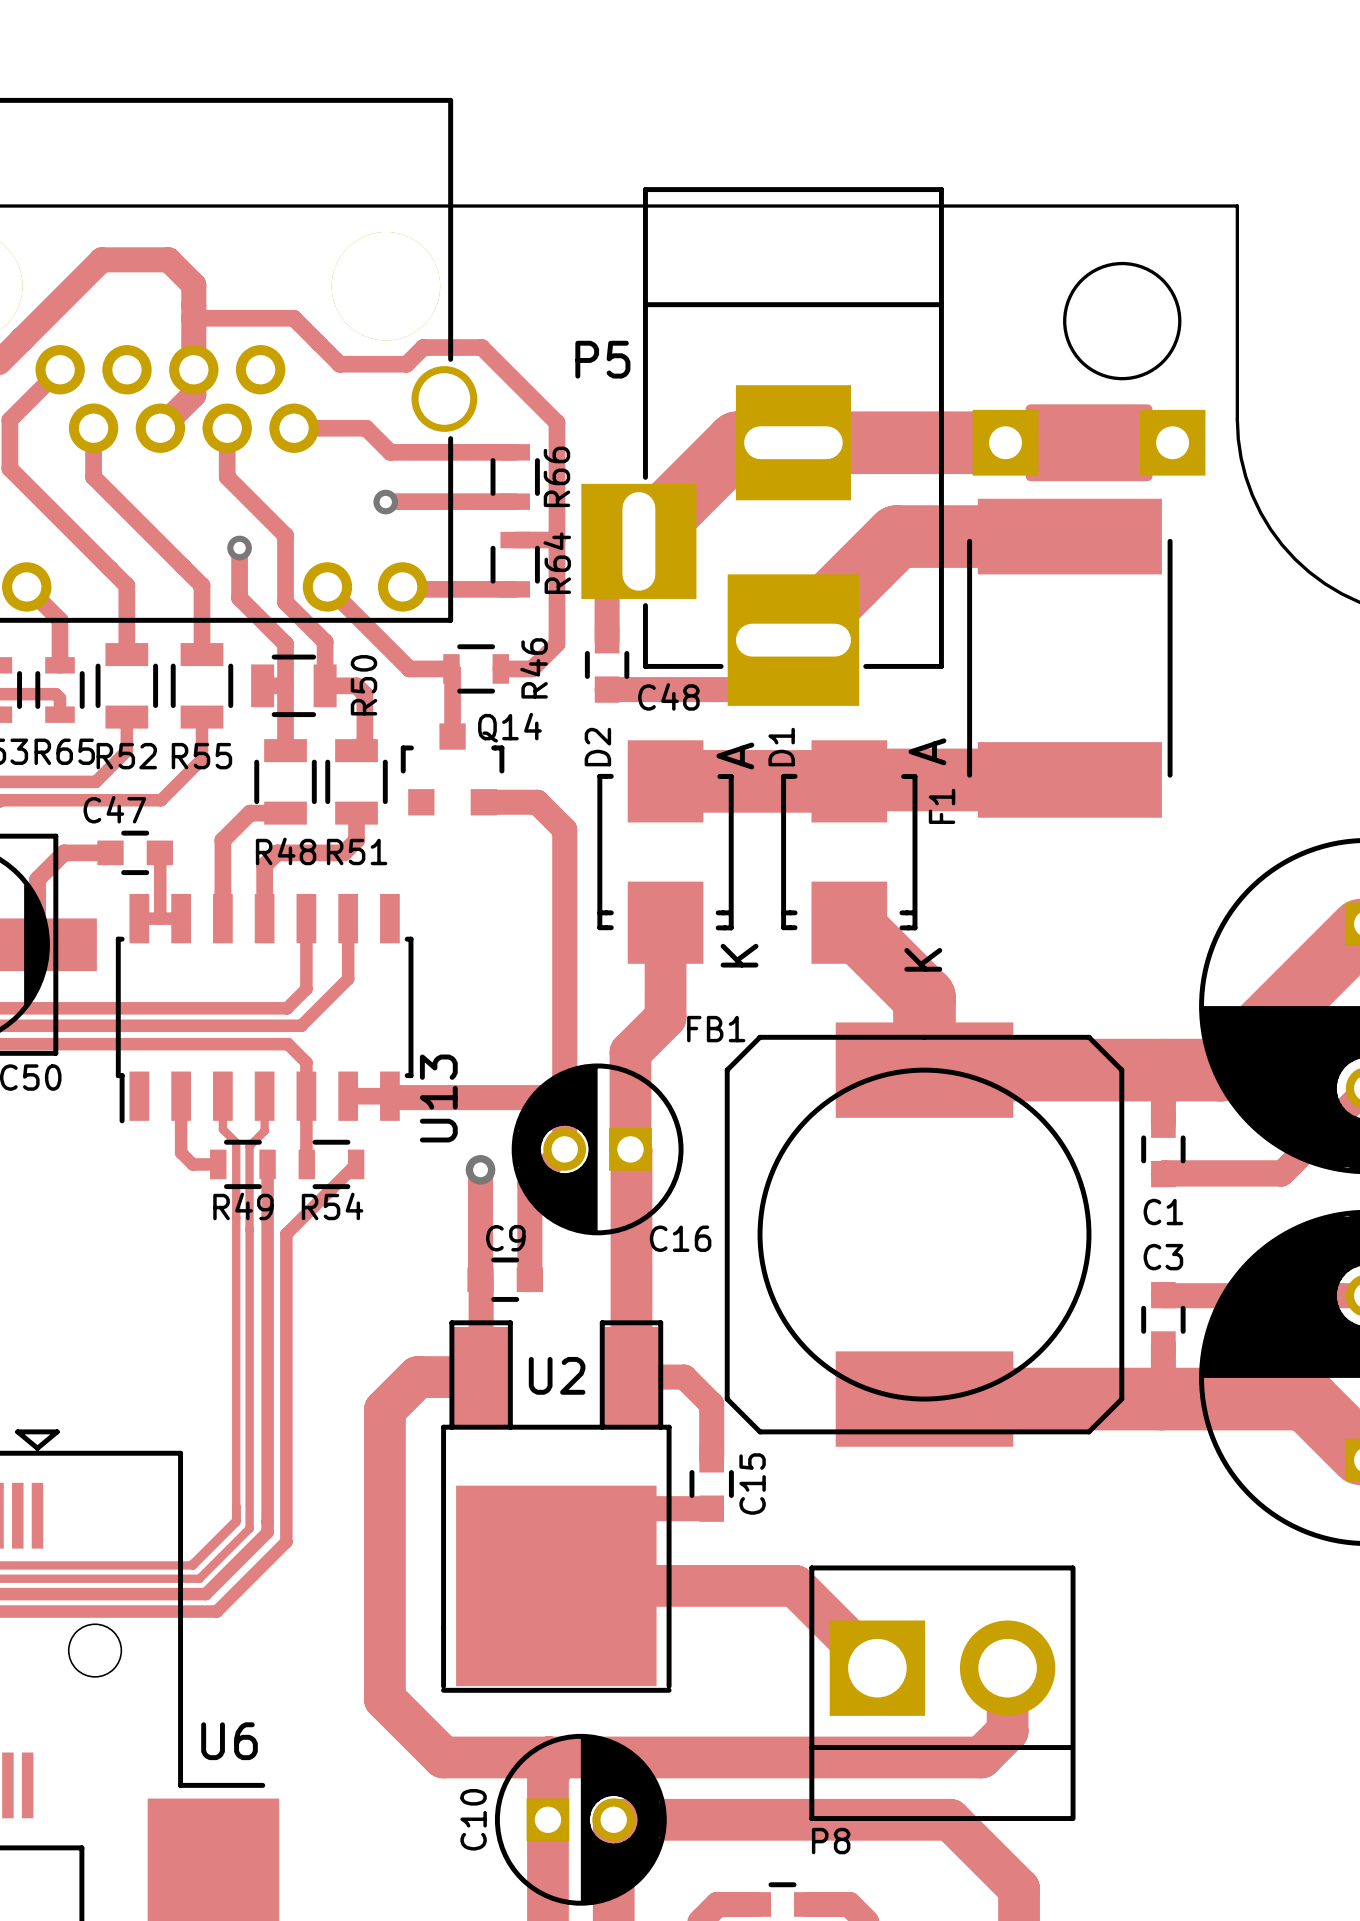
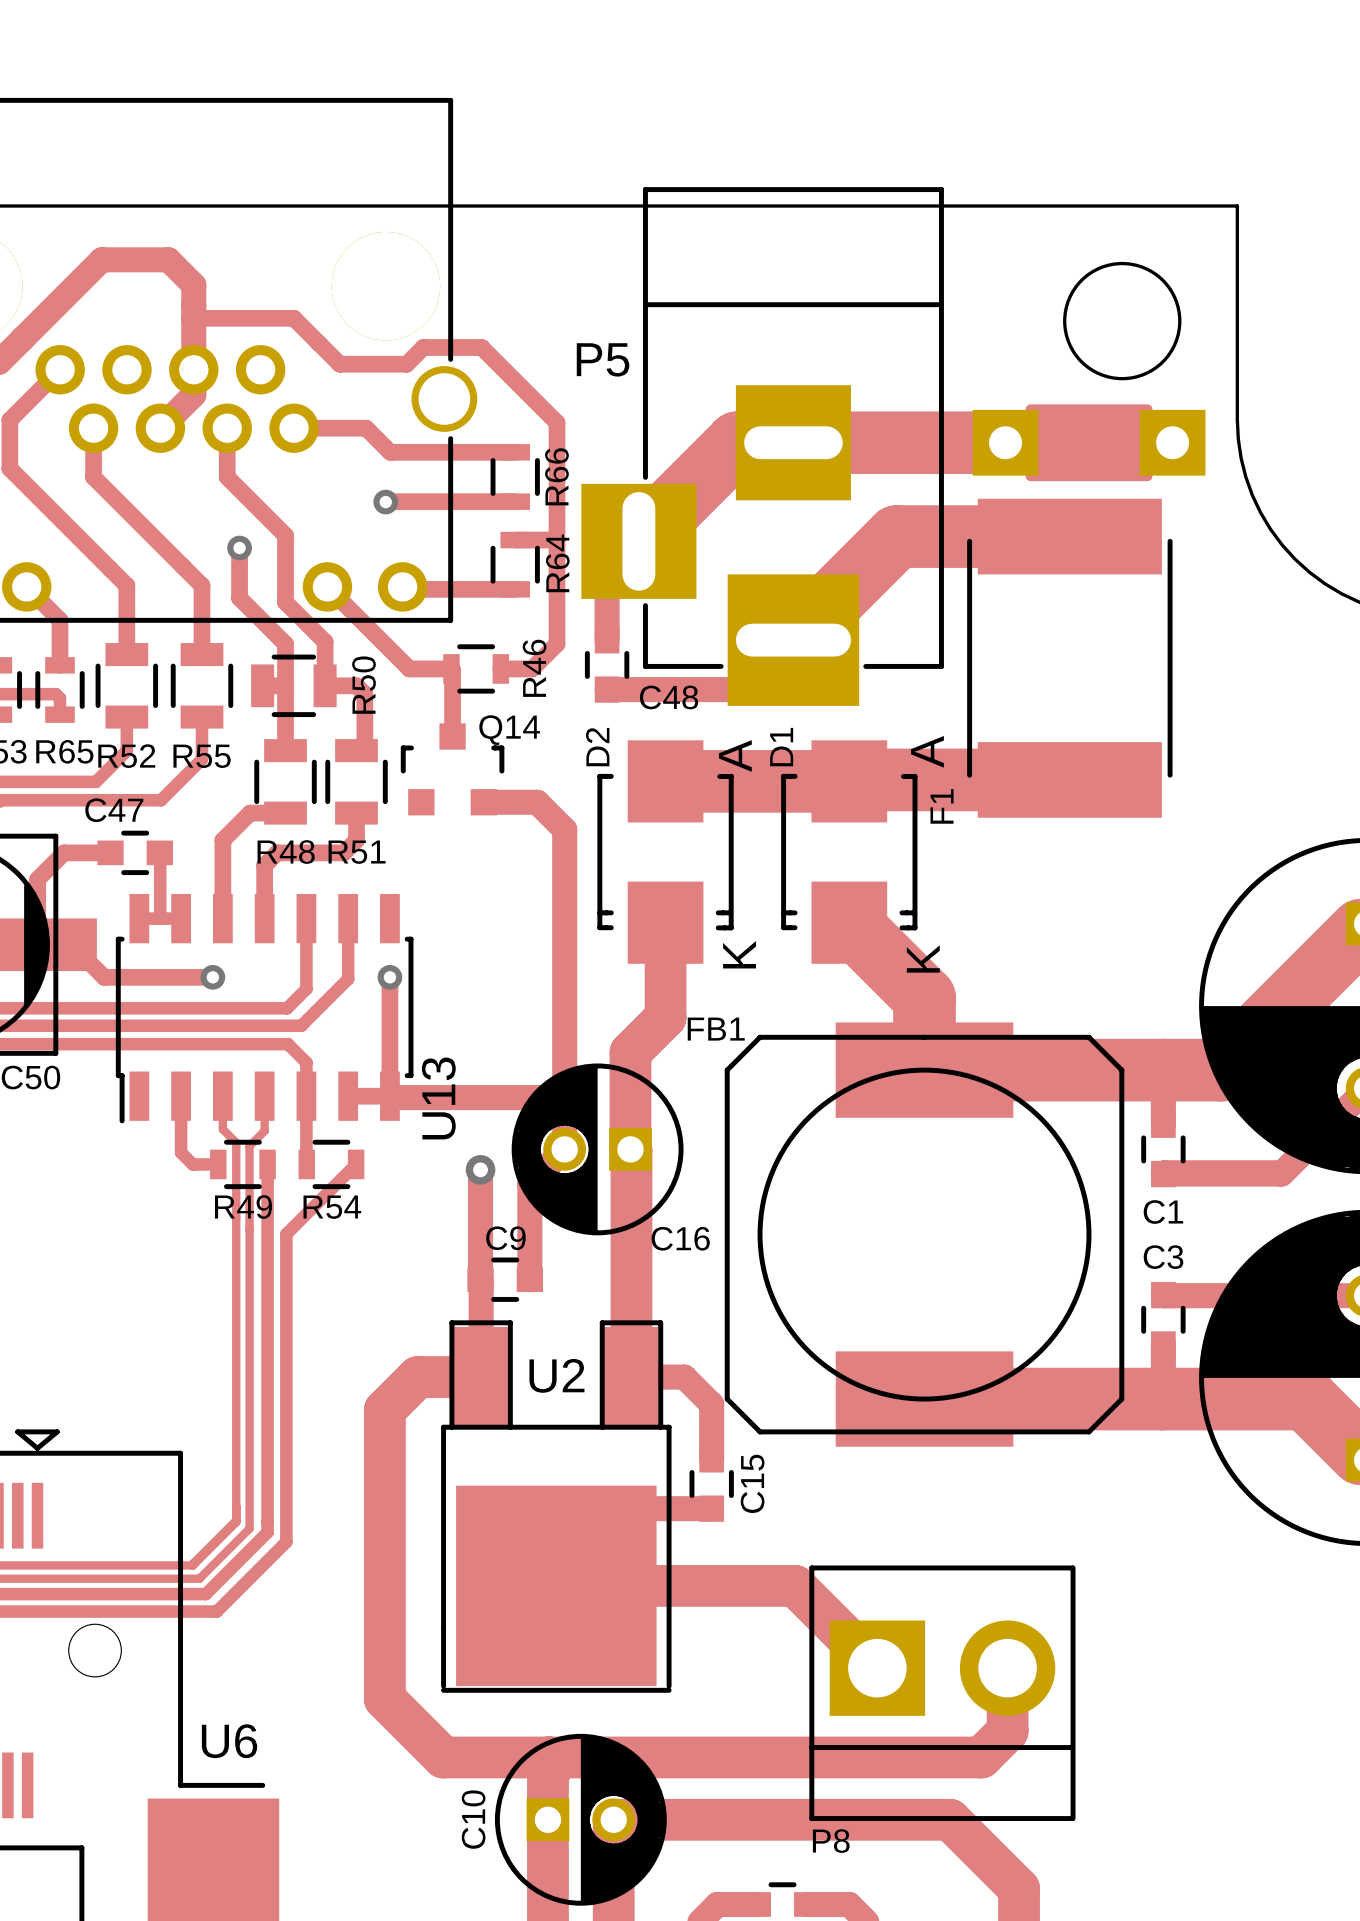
track: none -> (37, 944) (71, 944) (104, 977) (212, 977)
via: none -> (212, 977)
track: none -> (389, 977) (389, 1096)
via: none -> (389, 977)

